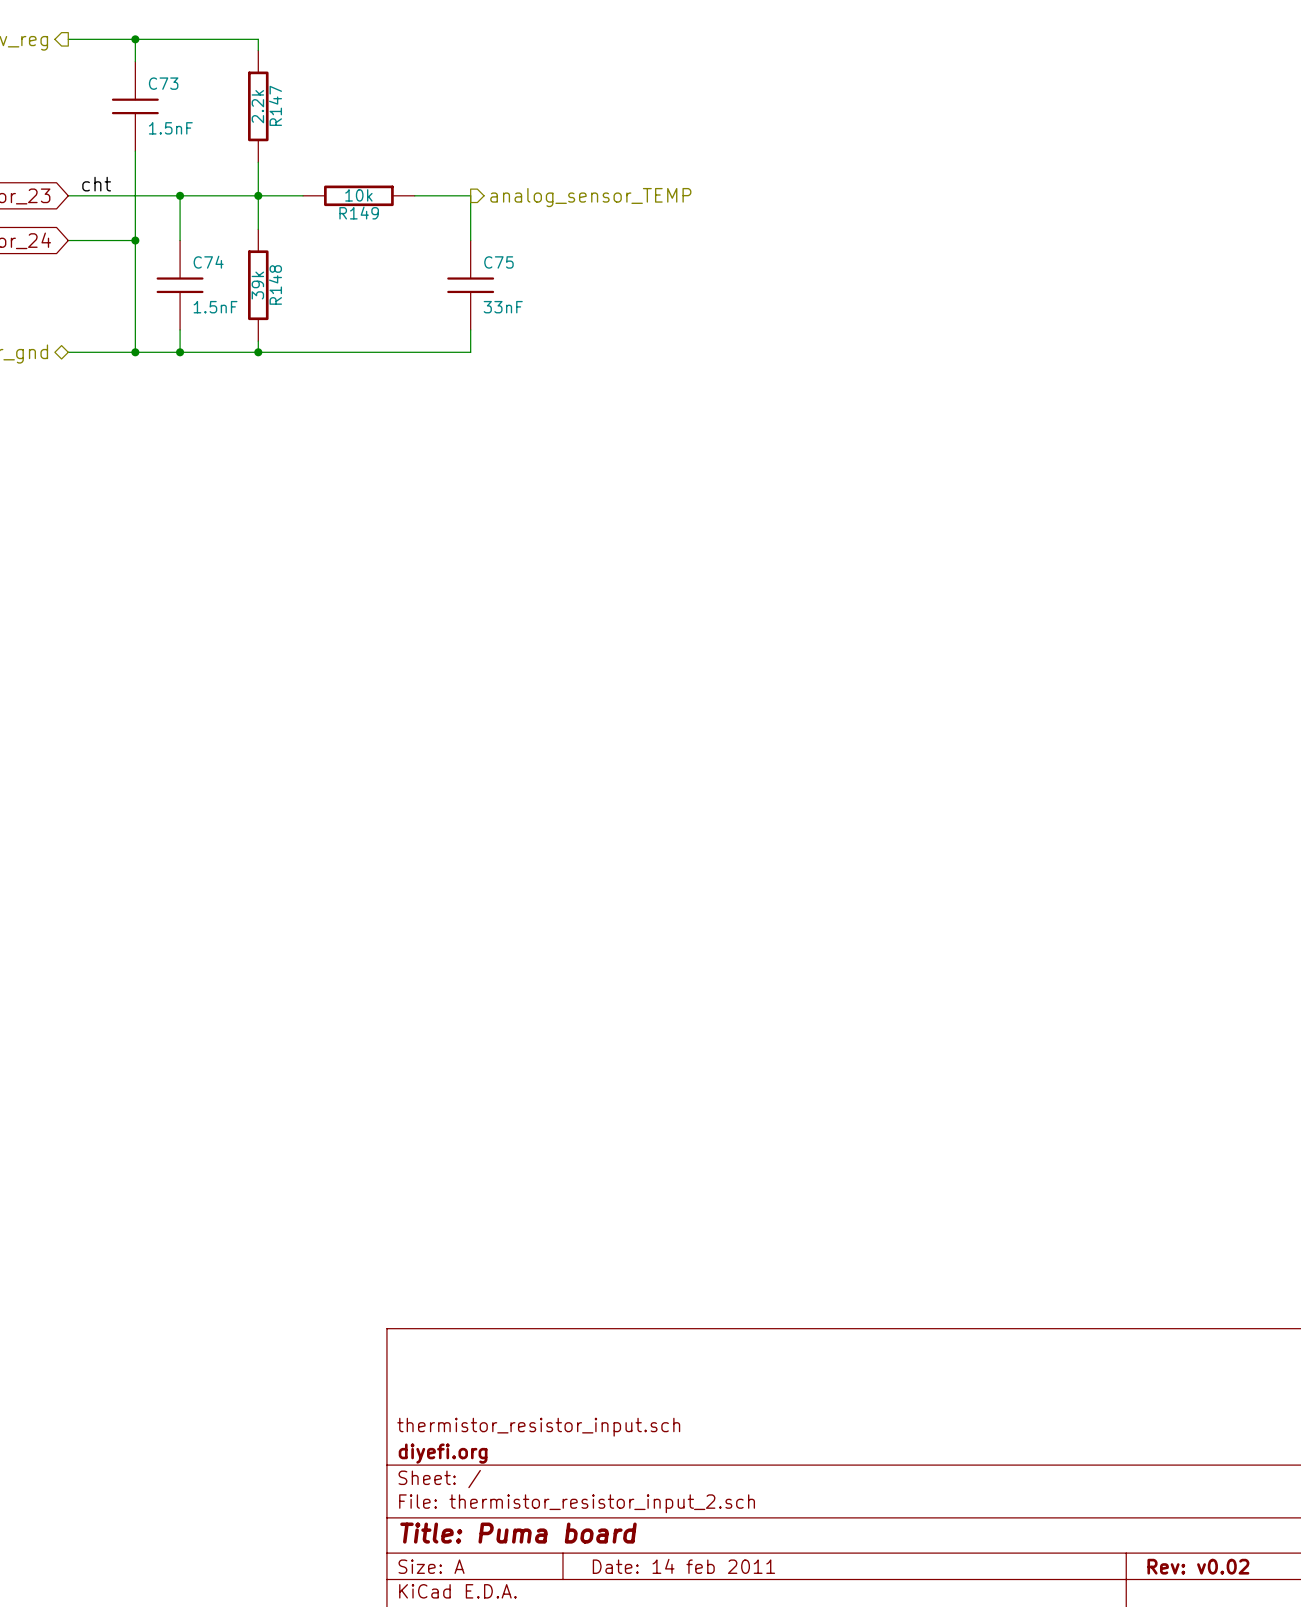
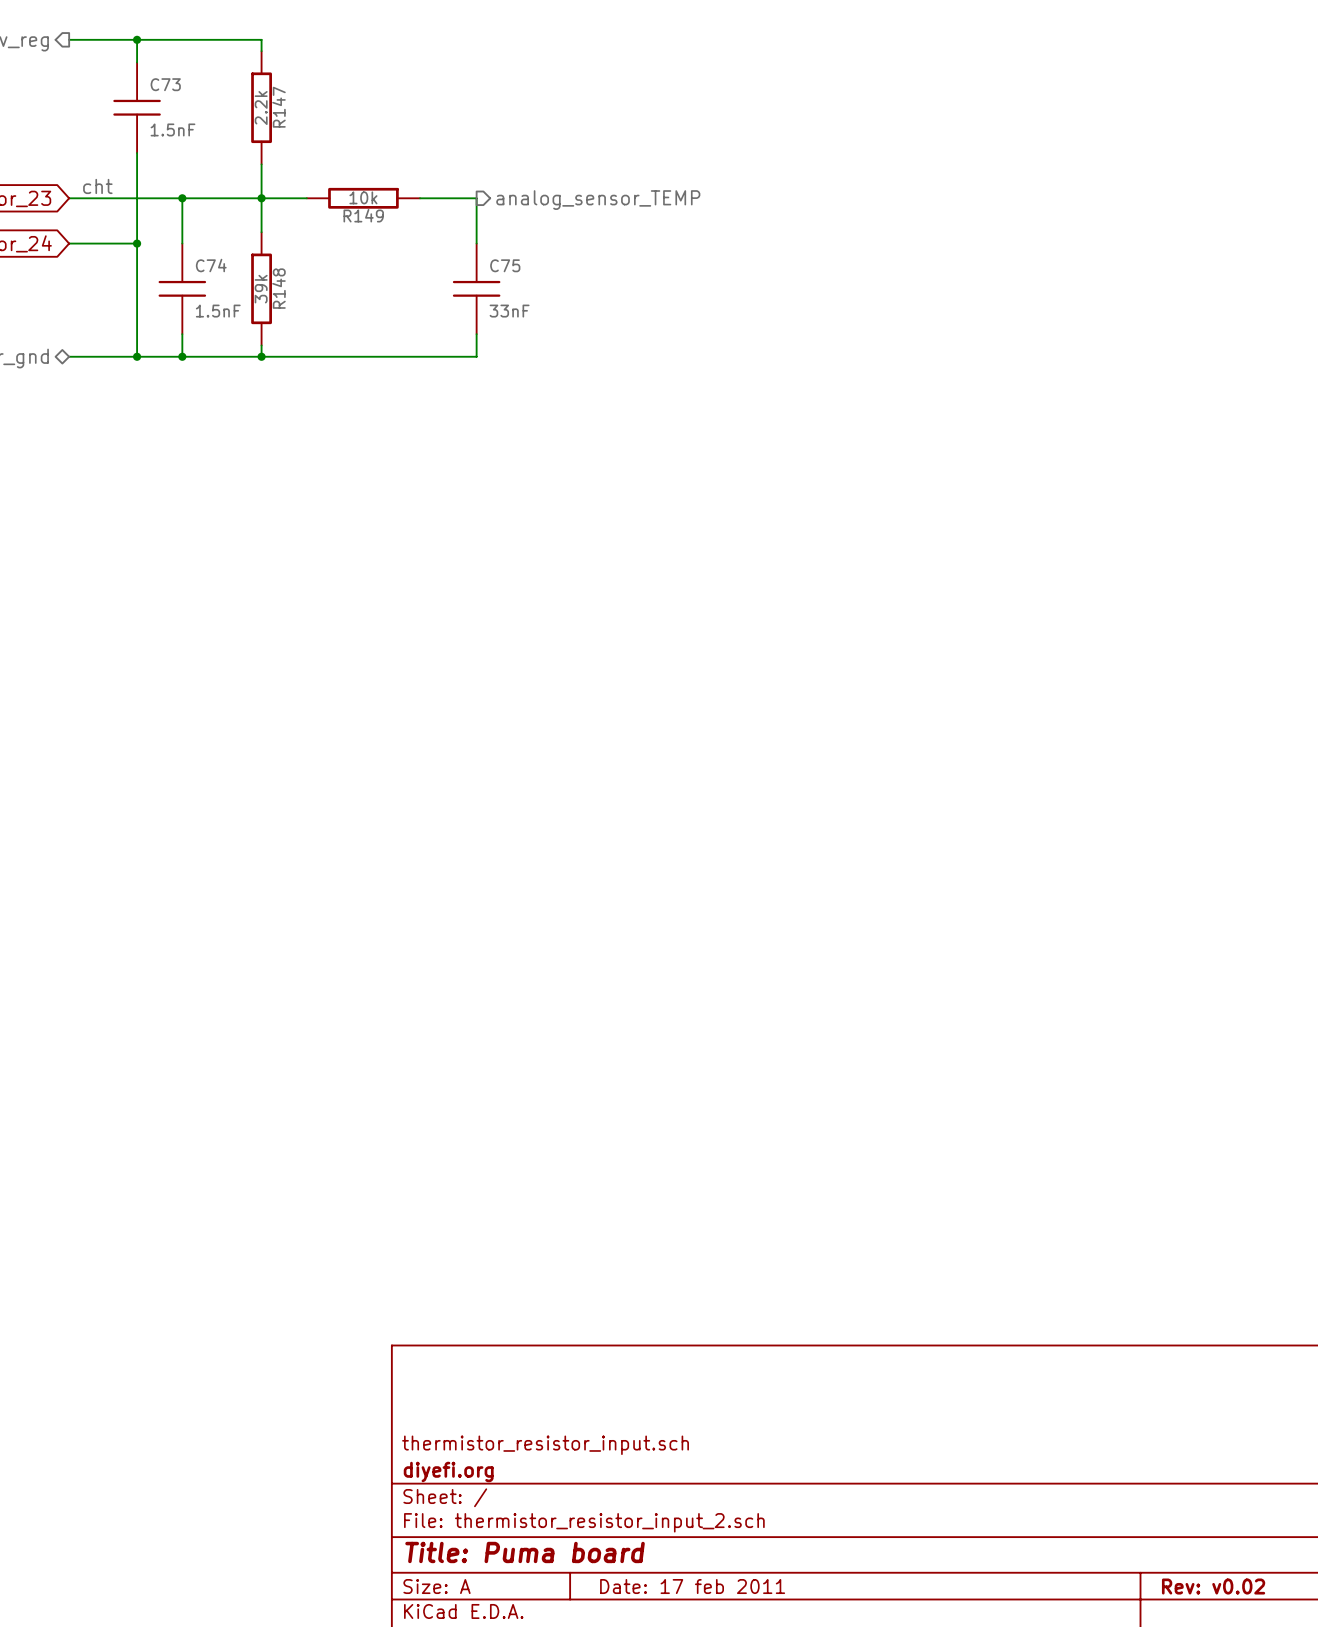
title block: Date: 14 feb 2011 (683, 1566) -> Date: 17 feb 2011 (692, 1586)

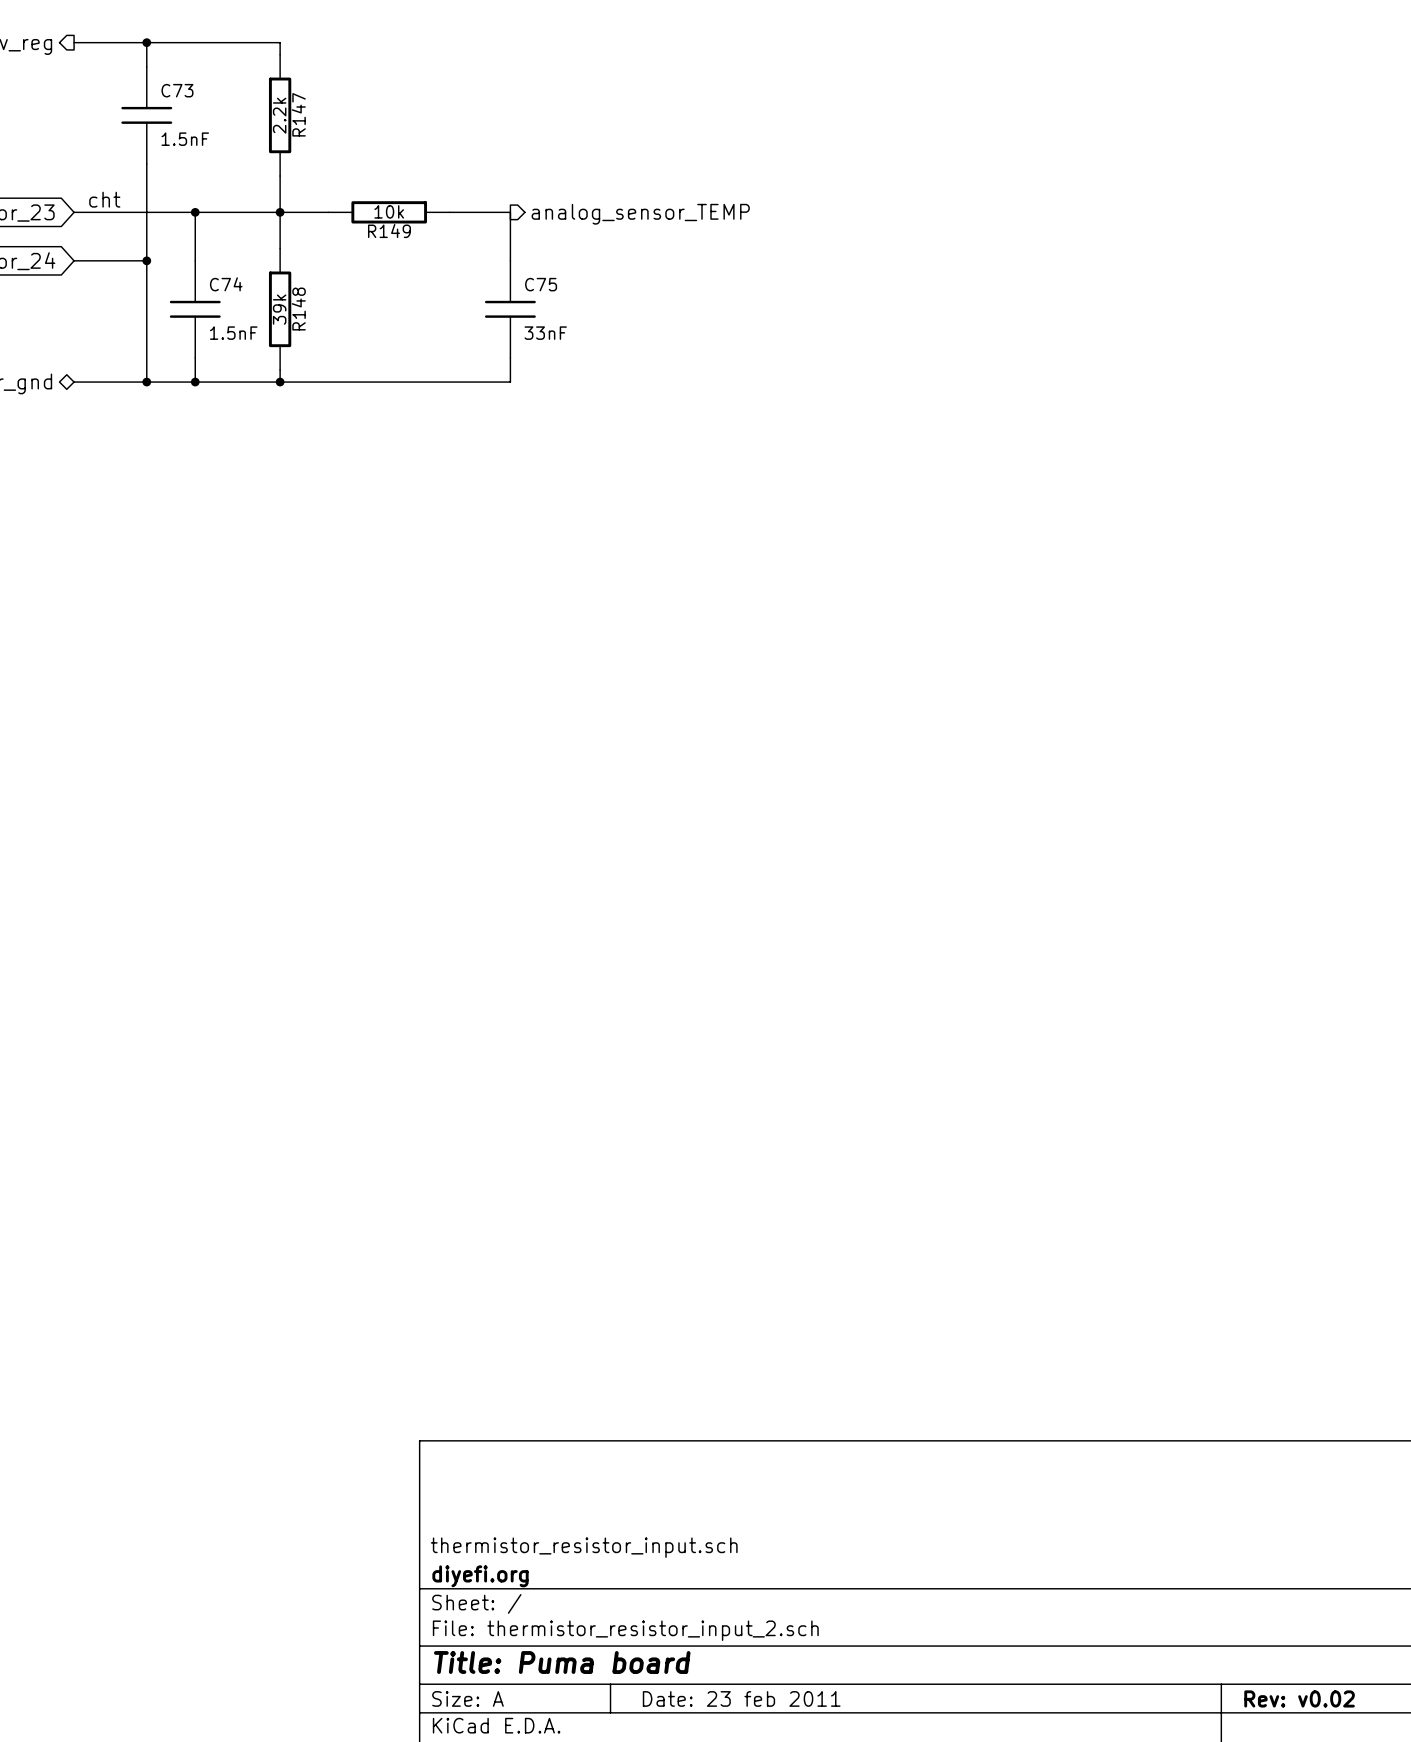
title block: Date: 17 feb 2011 (692, 1586) -> Date: 23 feb 2011 (741, 1698)

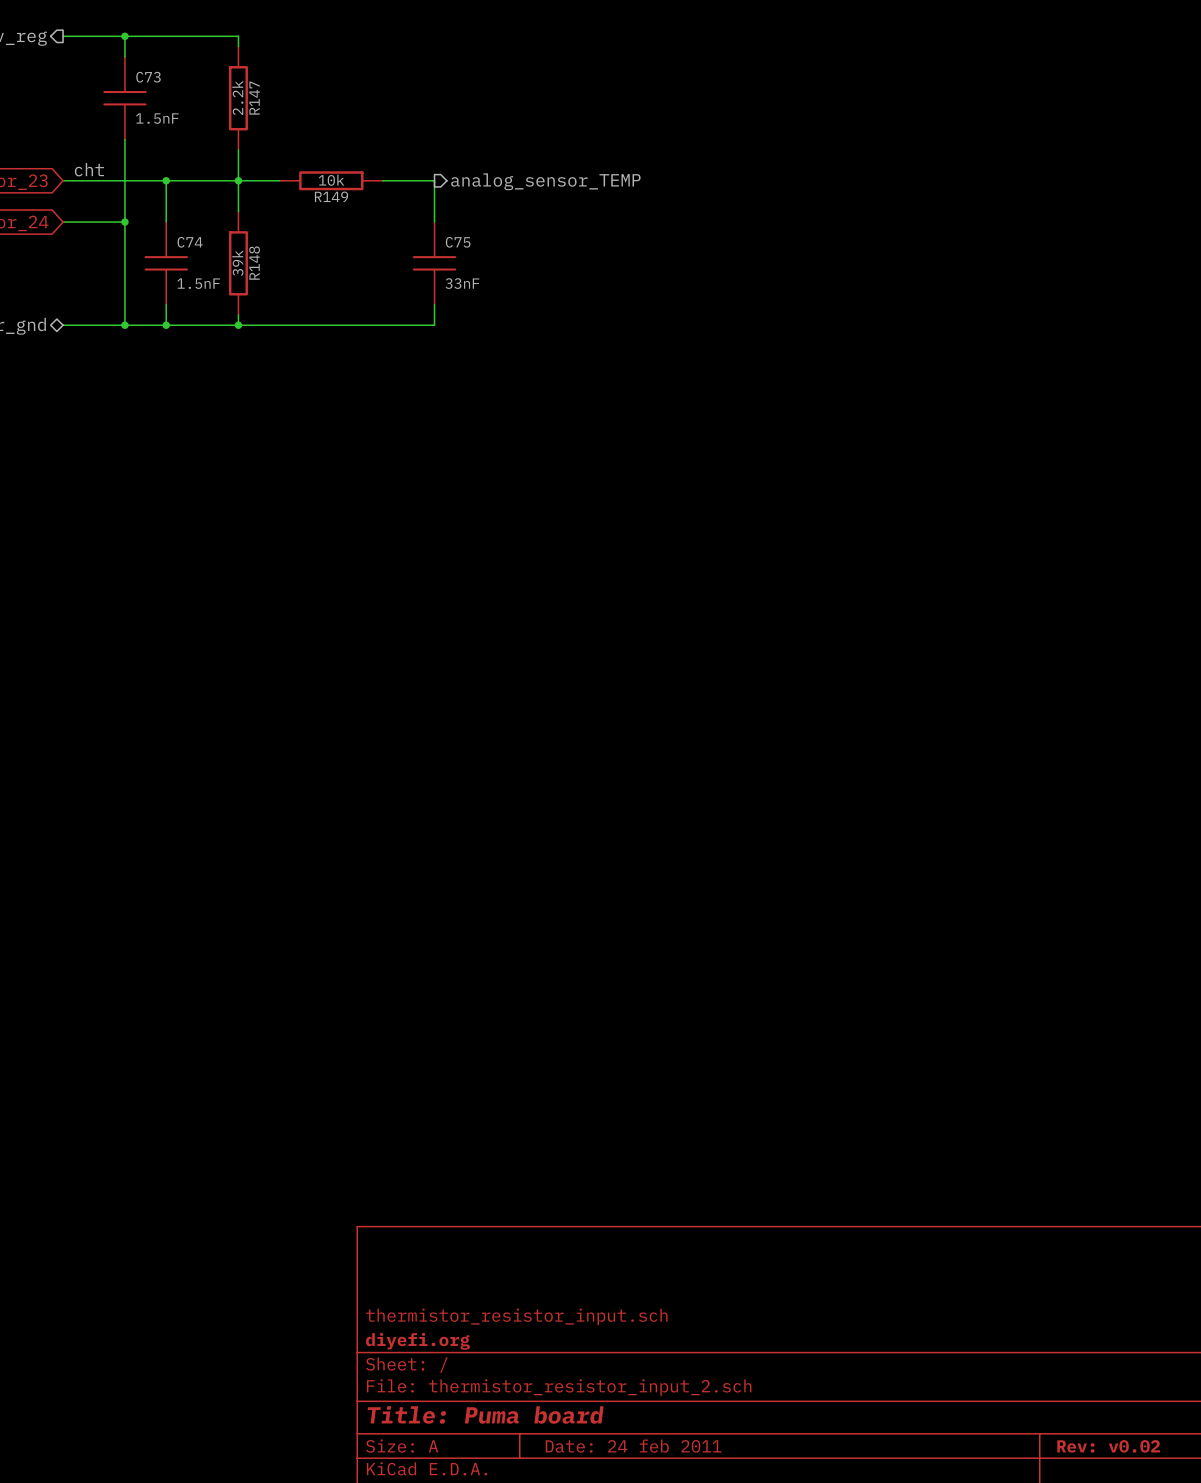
title block: Date: 23 feb 2011 (741, 1698) -> Date: 24 feb 2011 (633, 1446)

